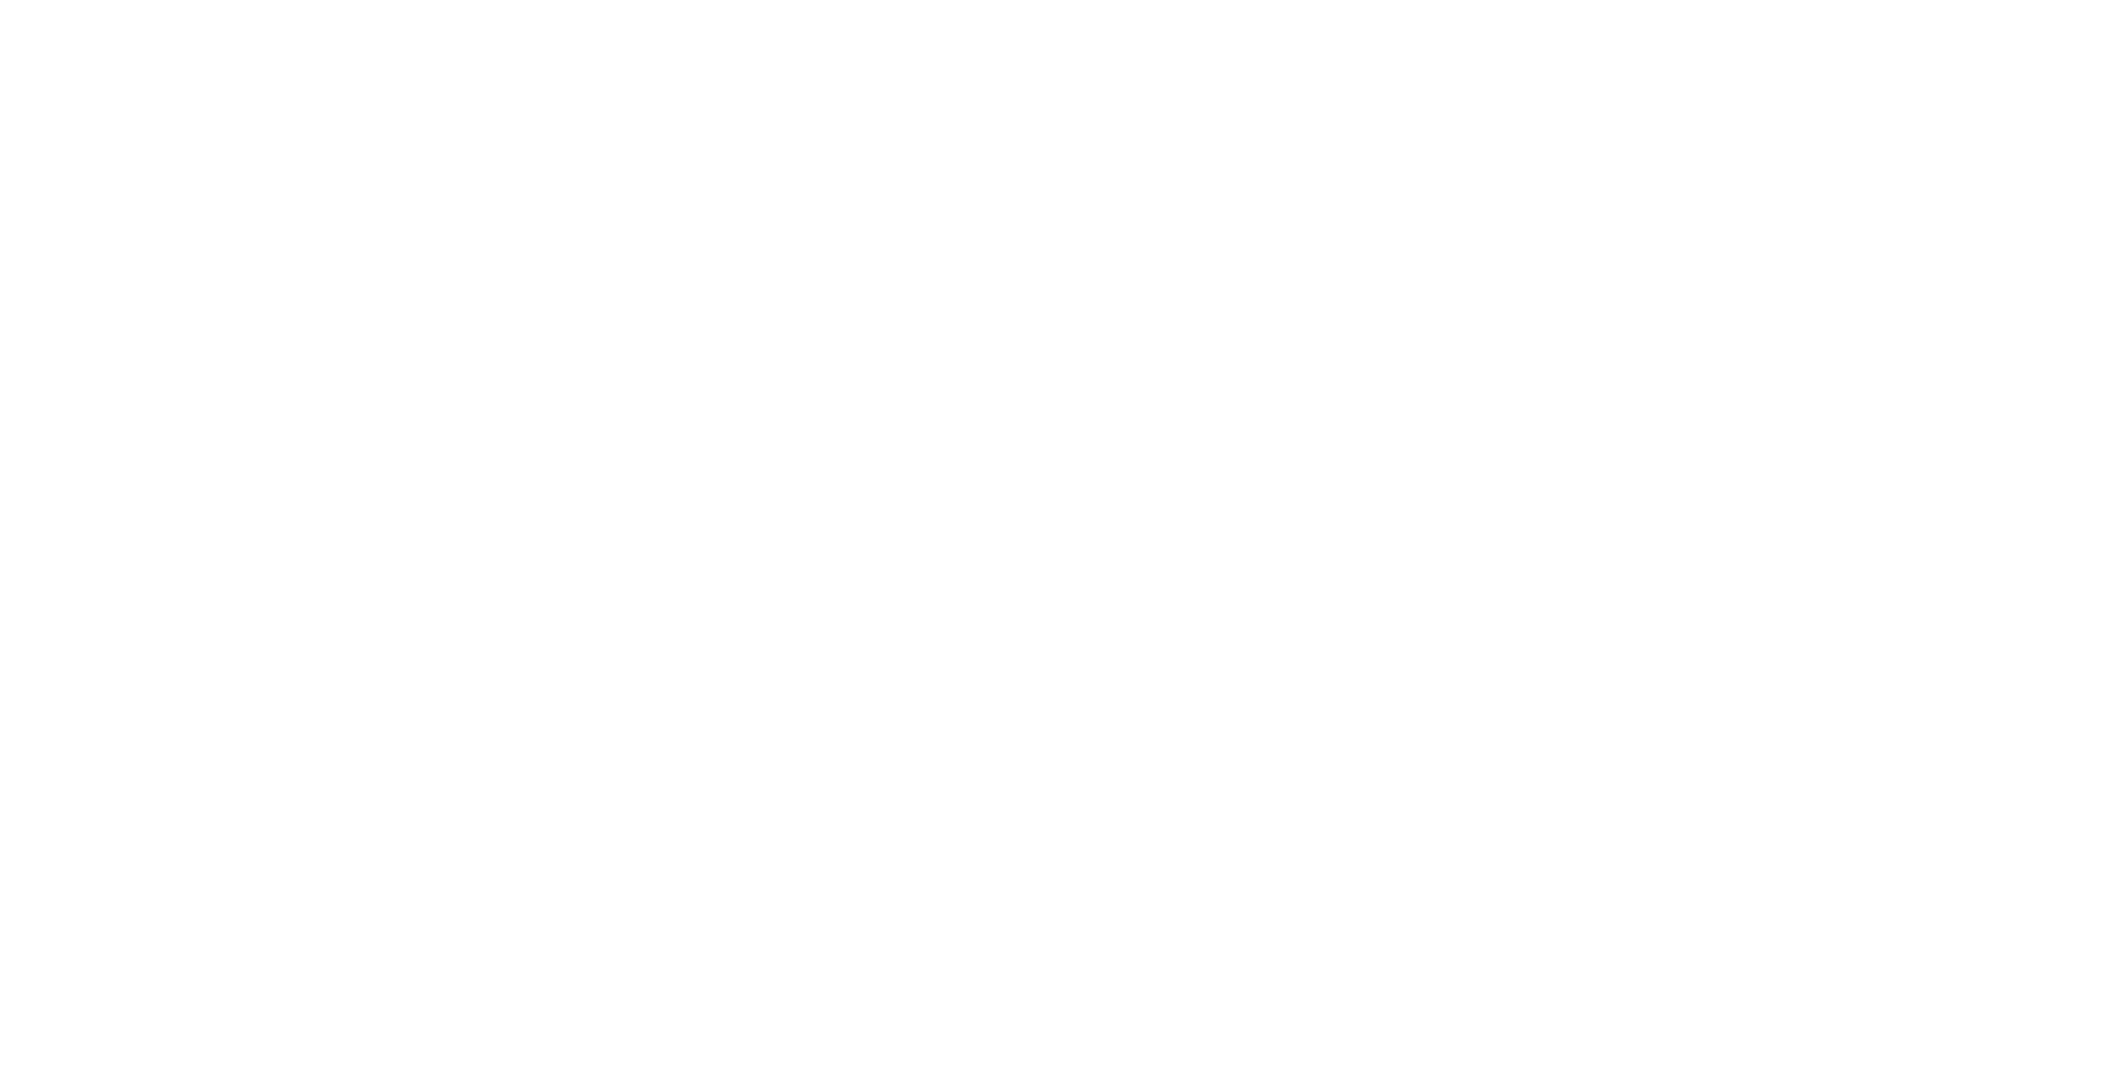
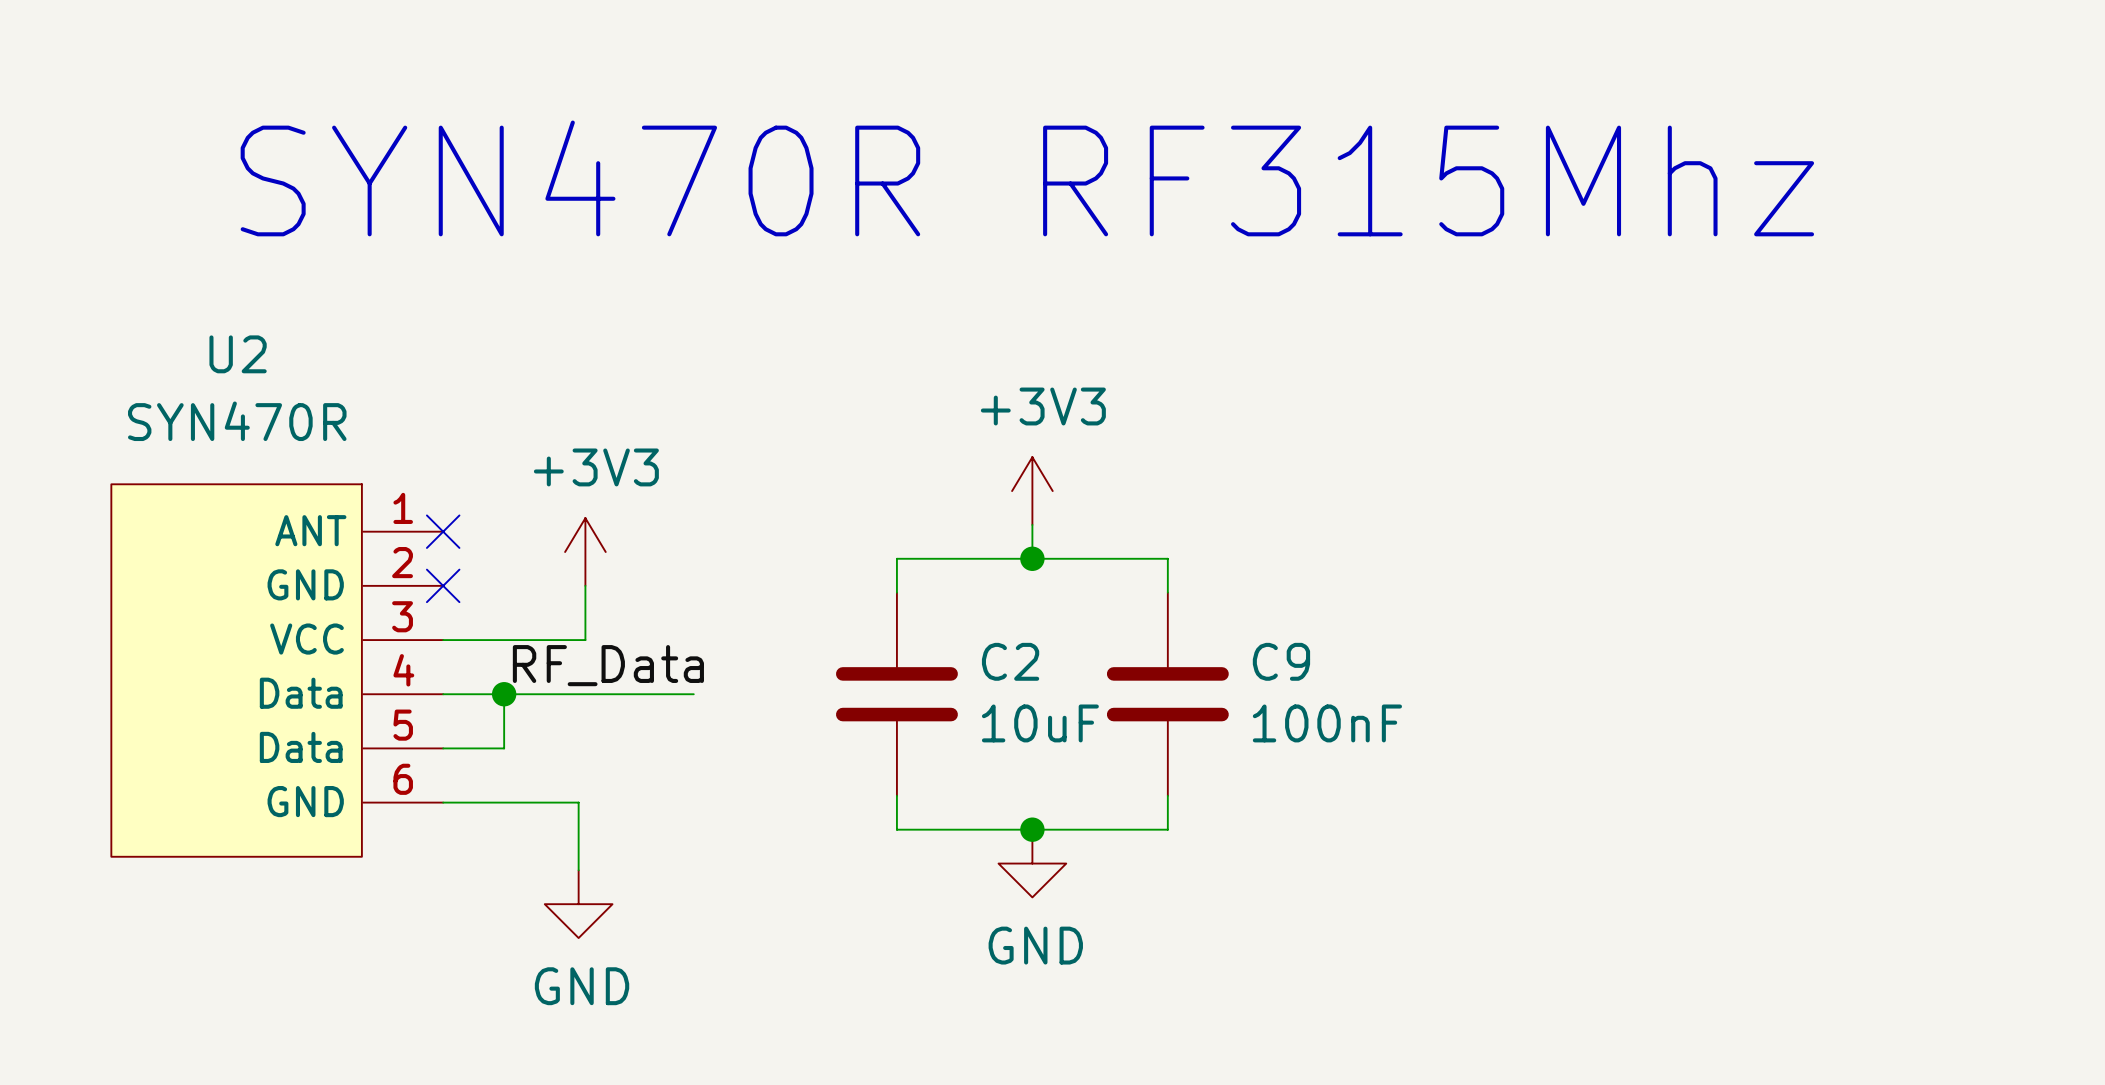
text: none -> SYN470R RF315Mhz (1027, 178)
power symbol: none -> +3V3 (1032, 491)
wire: none -> (1032, 524) (1032, 558)
no-connect mark: none -> (443, 531)
power symbol: none -> +3V3 (585, 552)
junction: none -> (1032, 558)
no-connect mark: none -> (443, 585)
wire: none -> (585, 585) (585, 640) (443, 640)
wire: none -> (896, 592) (896, 558) (1167, 558) (1167, 592)
label: none -> RF_Data (608, 665)
U2: none -> SYN470R (277, 670)
wire: none -> (443, 694) (693, 694)
wire: none -> (504, 694) (504, 748) (443, 748)
junction: none -> (504, 694)
C2: none -> 10uF (896, 694)
C9: none -> 100nF (1167, 694)
wire: none -> (896, 795) (896, 829) (1167, 829) (1167, 795)
wire: none -> (443, 802) (578, 802) (578, 870)
junction: none -> (1032, 829)
power symbol: none -> GND (1032, 863)
power symbol: none -> GND (578, 904)

